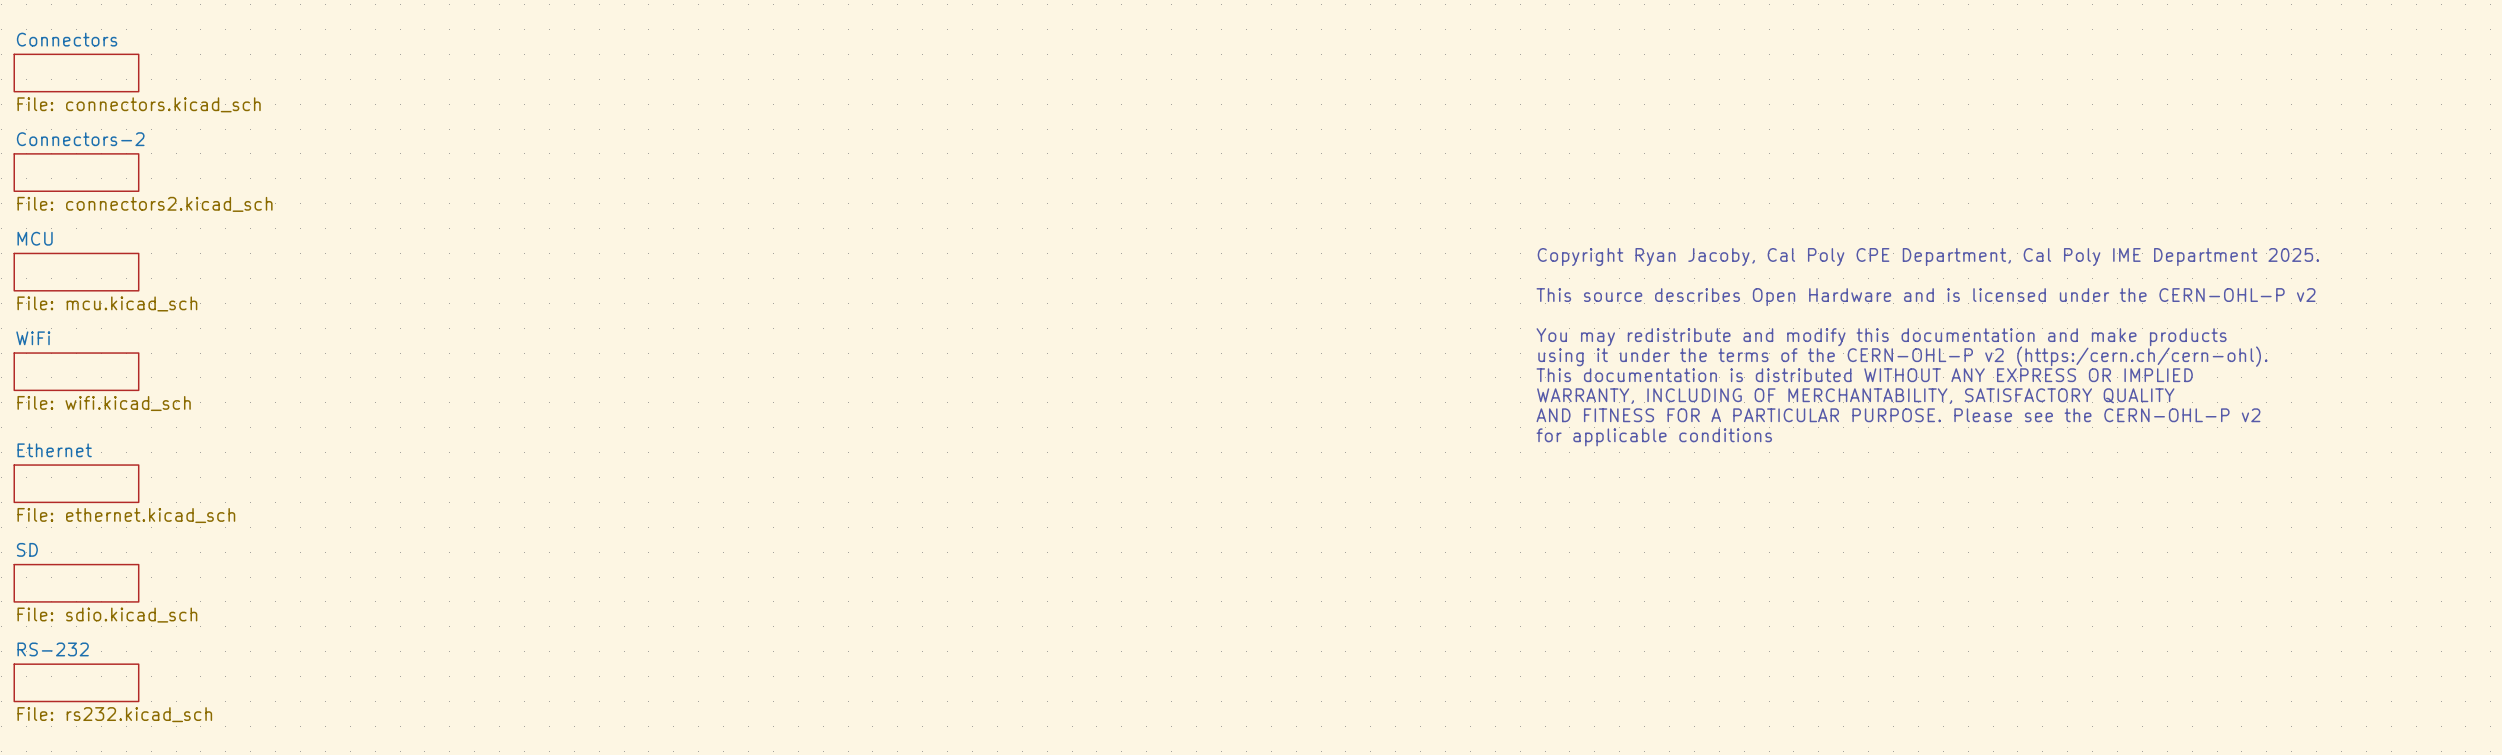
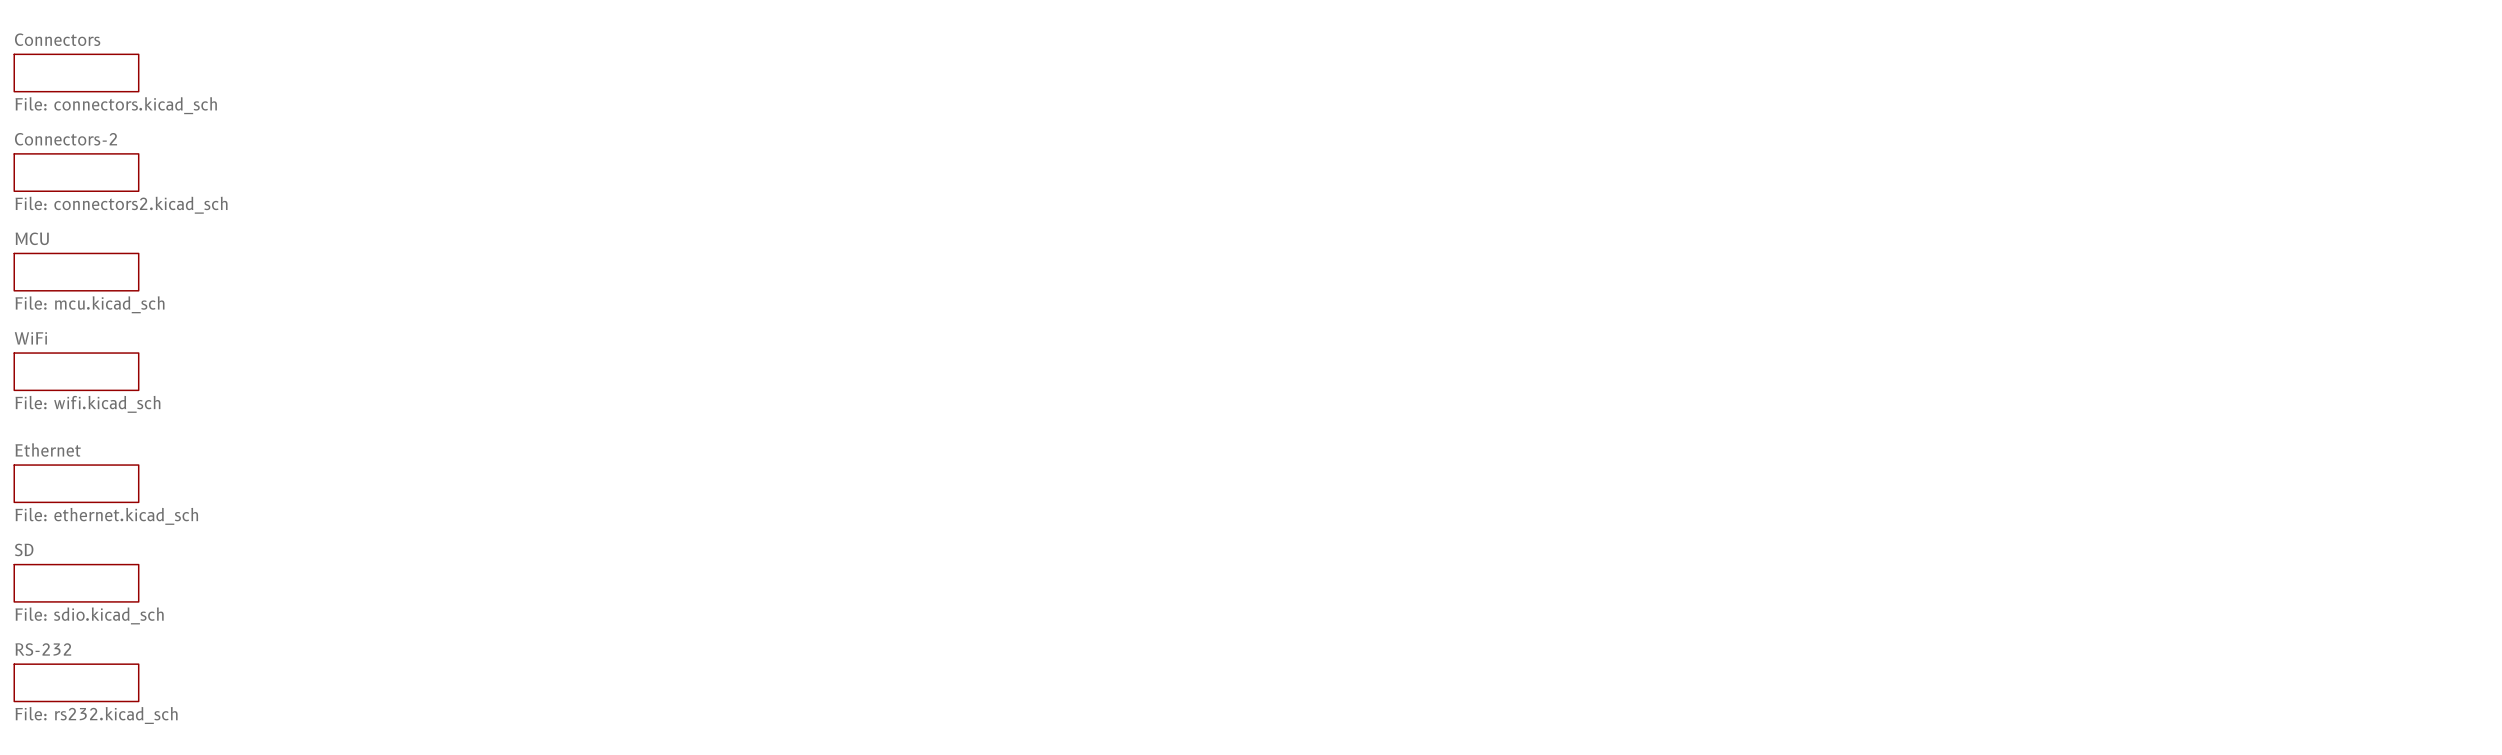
text: Copyright Ryan Jacoby, Cal Poly CPE Department, Cal Poly IME Department 2025. (1928, 257) -> none
text: This source describes Open Hardware and is licensed under the CERN-OHL-P v2 (1926, 297) -> none
text: You may redistribute and modify this documentation and make products (1881, 337) -> none
text: using it under the terms of the CERN-OHL-P v2 (https:/cern.ch/cern-ohl). (1902, 356) -> none
text: This documentation is distributed WITHOUT ANY EXPRESS OR IMPLIED (1864, 375) -> none
text: WARRANTY, INCLUDING OF MERCHANTABILITY, SATISFACTORY QUALITY (1855, 396) -> none
text: AND FITNESS FOR A PARTICULAR PURPOSE. Please see the CERN-OHL-P v2 (1898, 415) -> none
text: for applicable conditions (1654, 437) -> none

